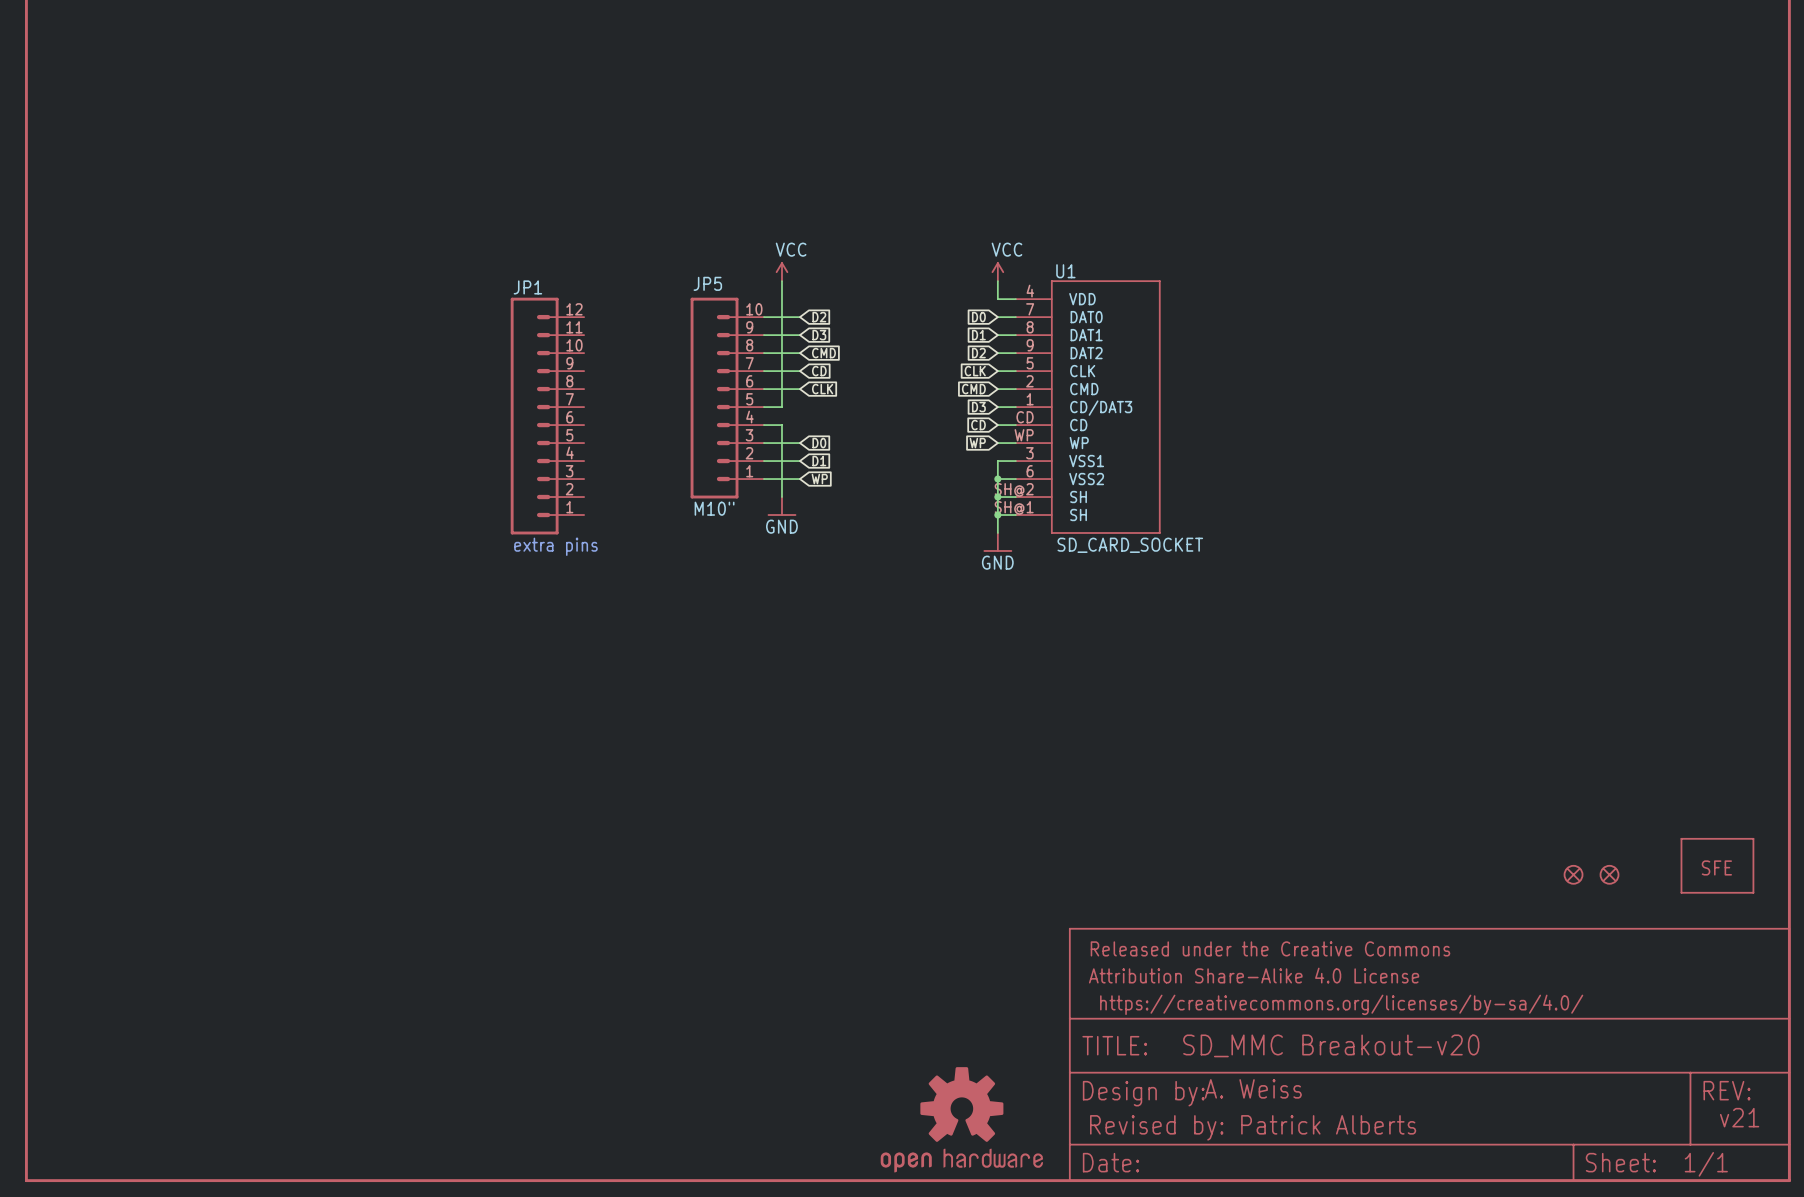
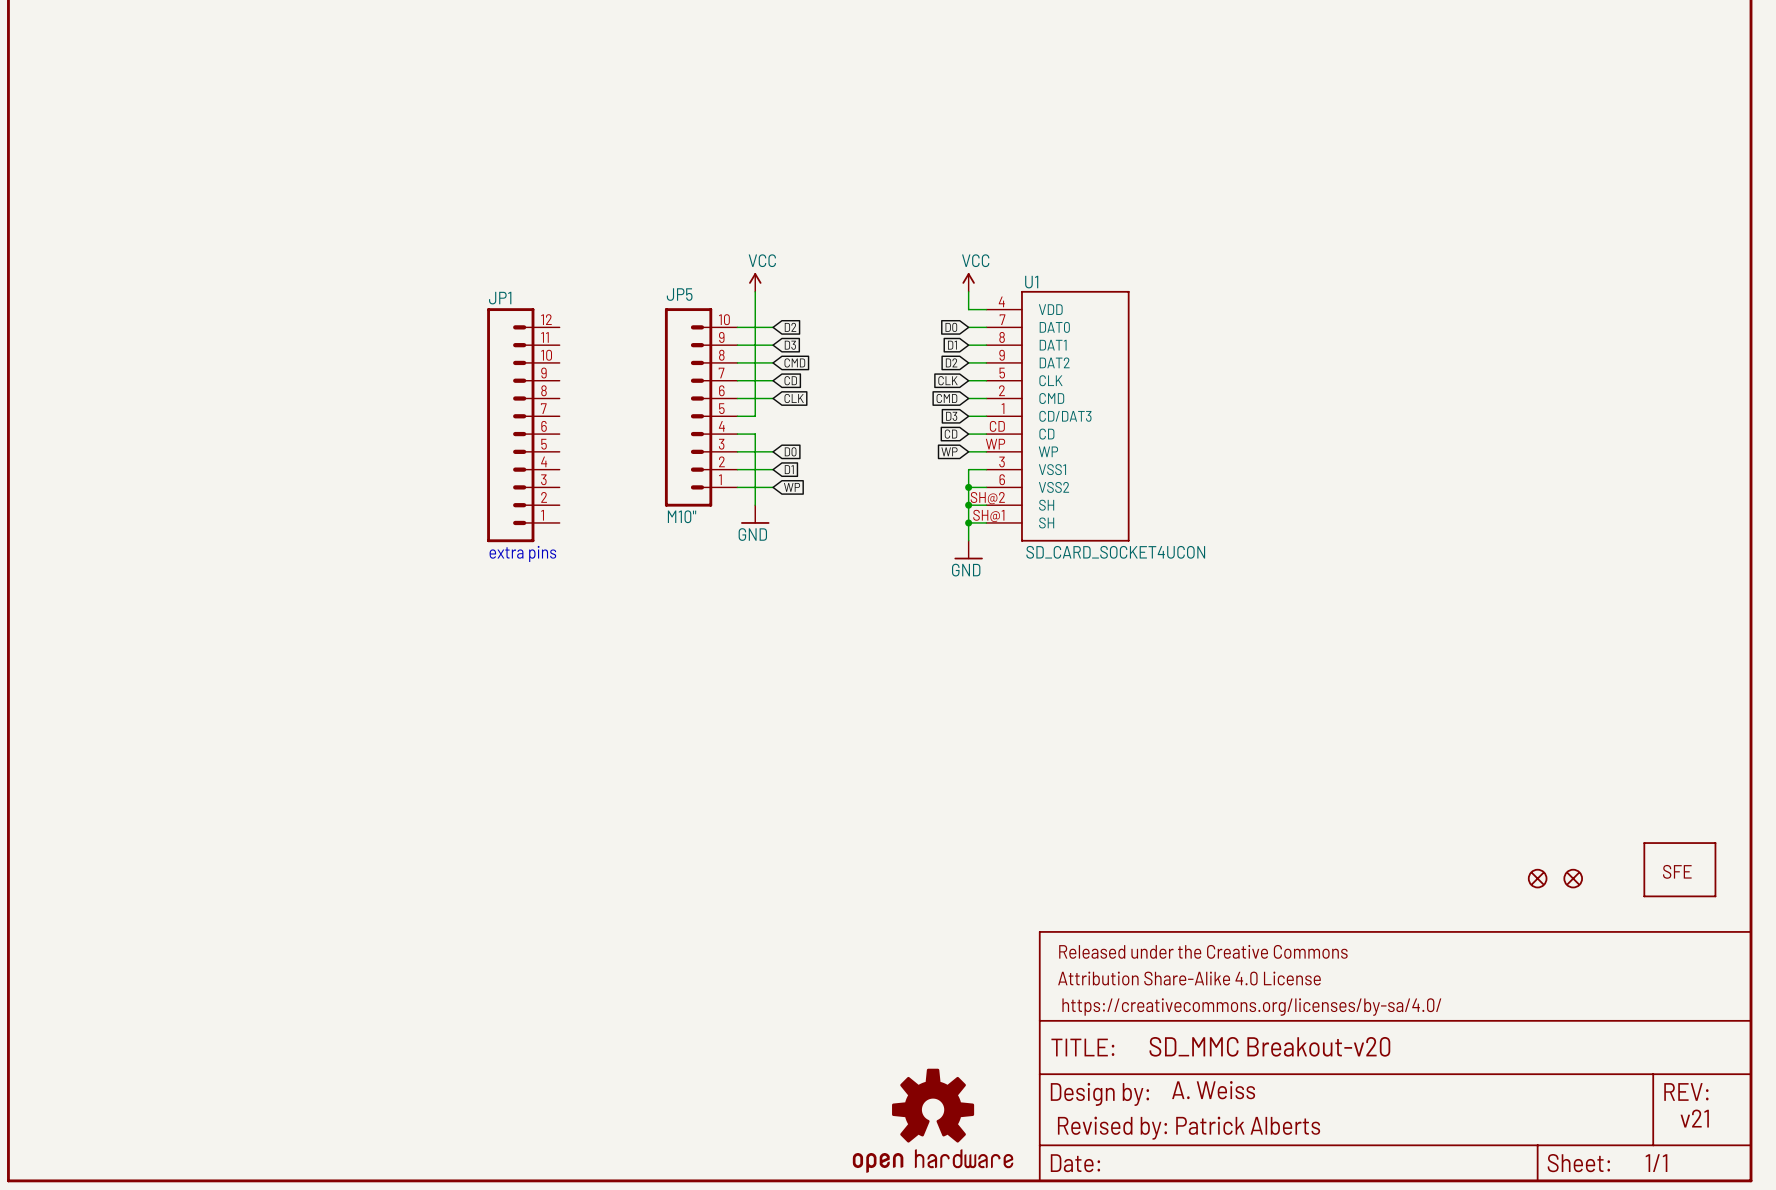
U1 value: SD_CARD_SOCKET (1130, 545) -> SD_CARD_SOCKET4UCON (1115, 552)

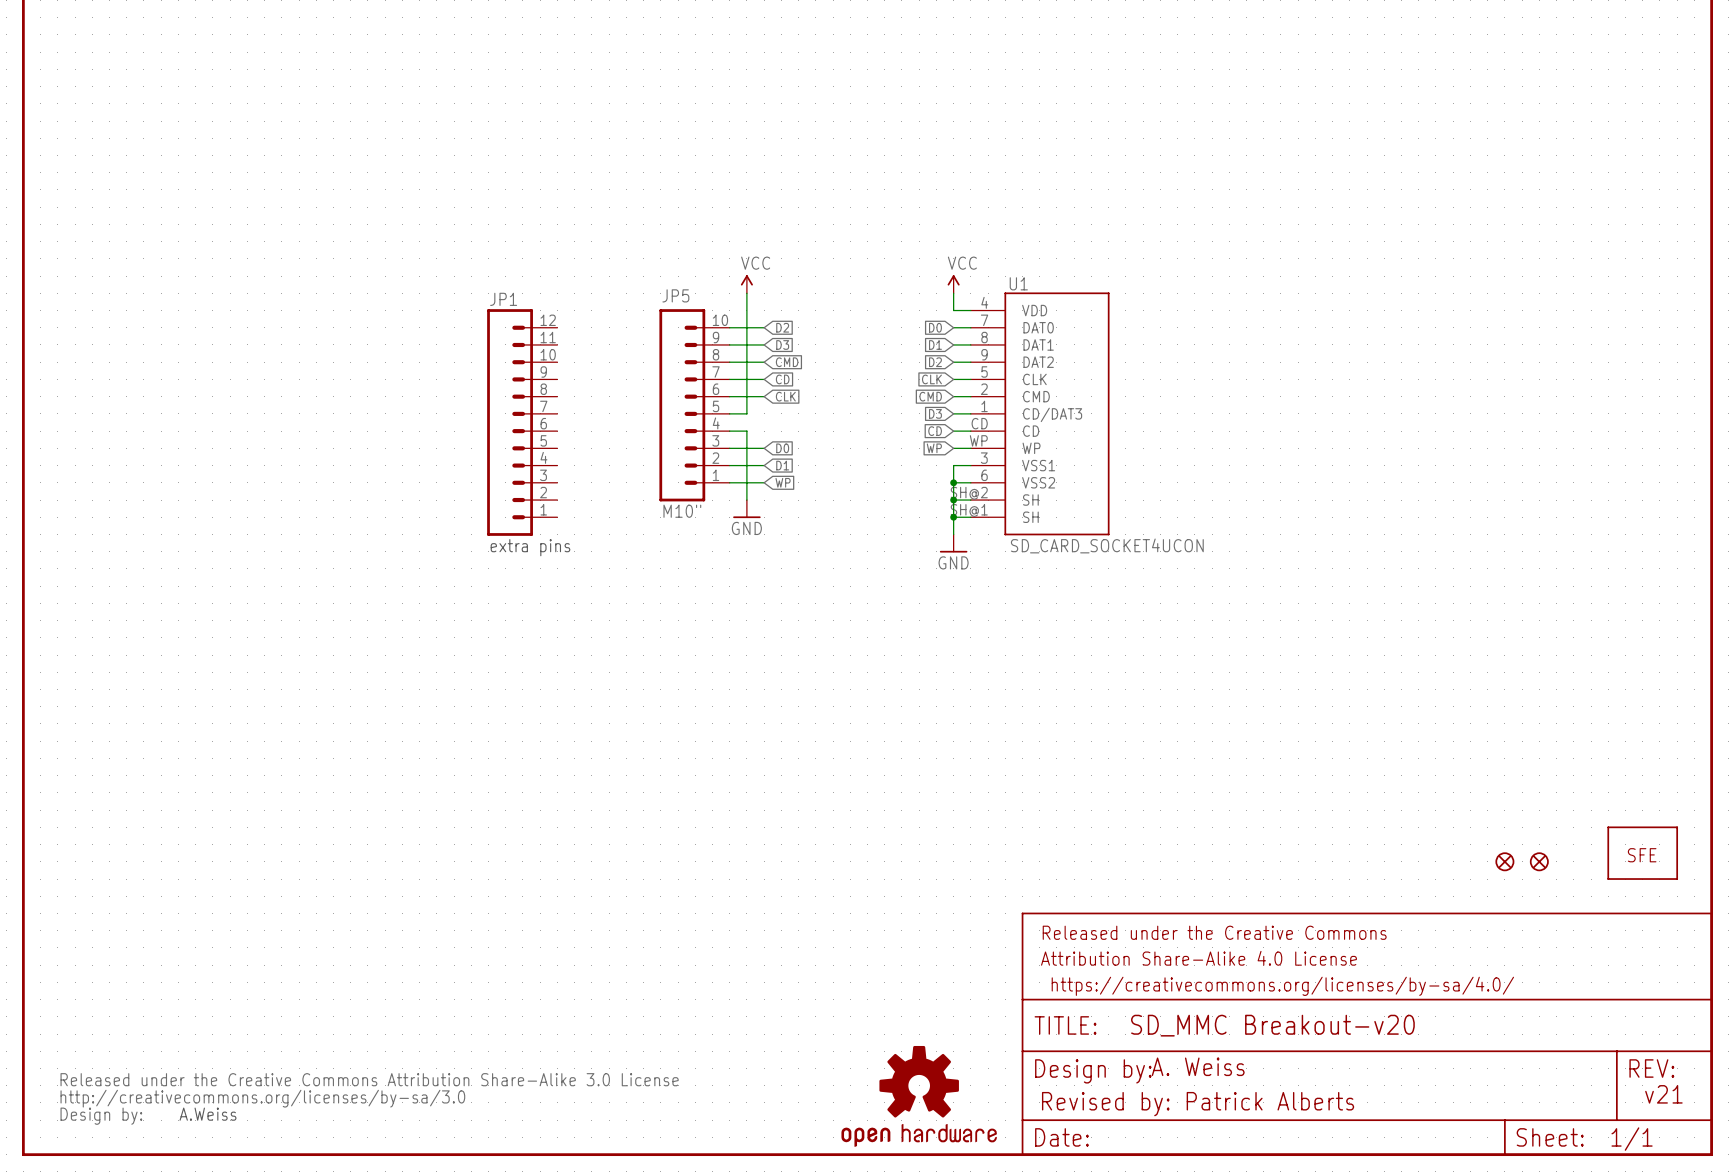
part: none -> (369, 1098)
text: none -> A.Weiss (208, 1114)

